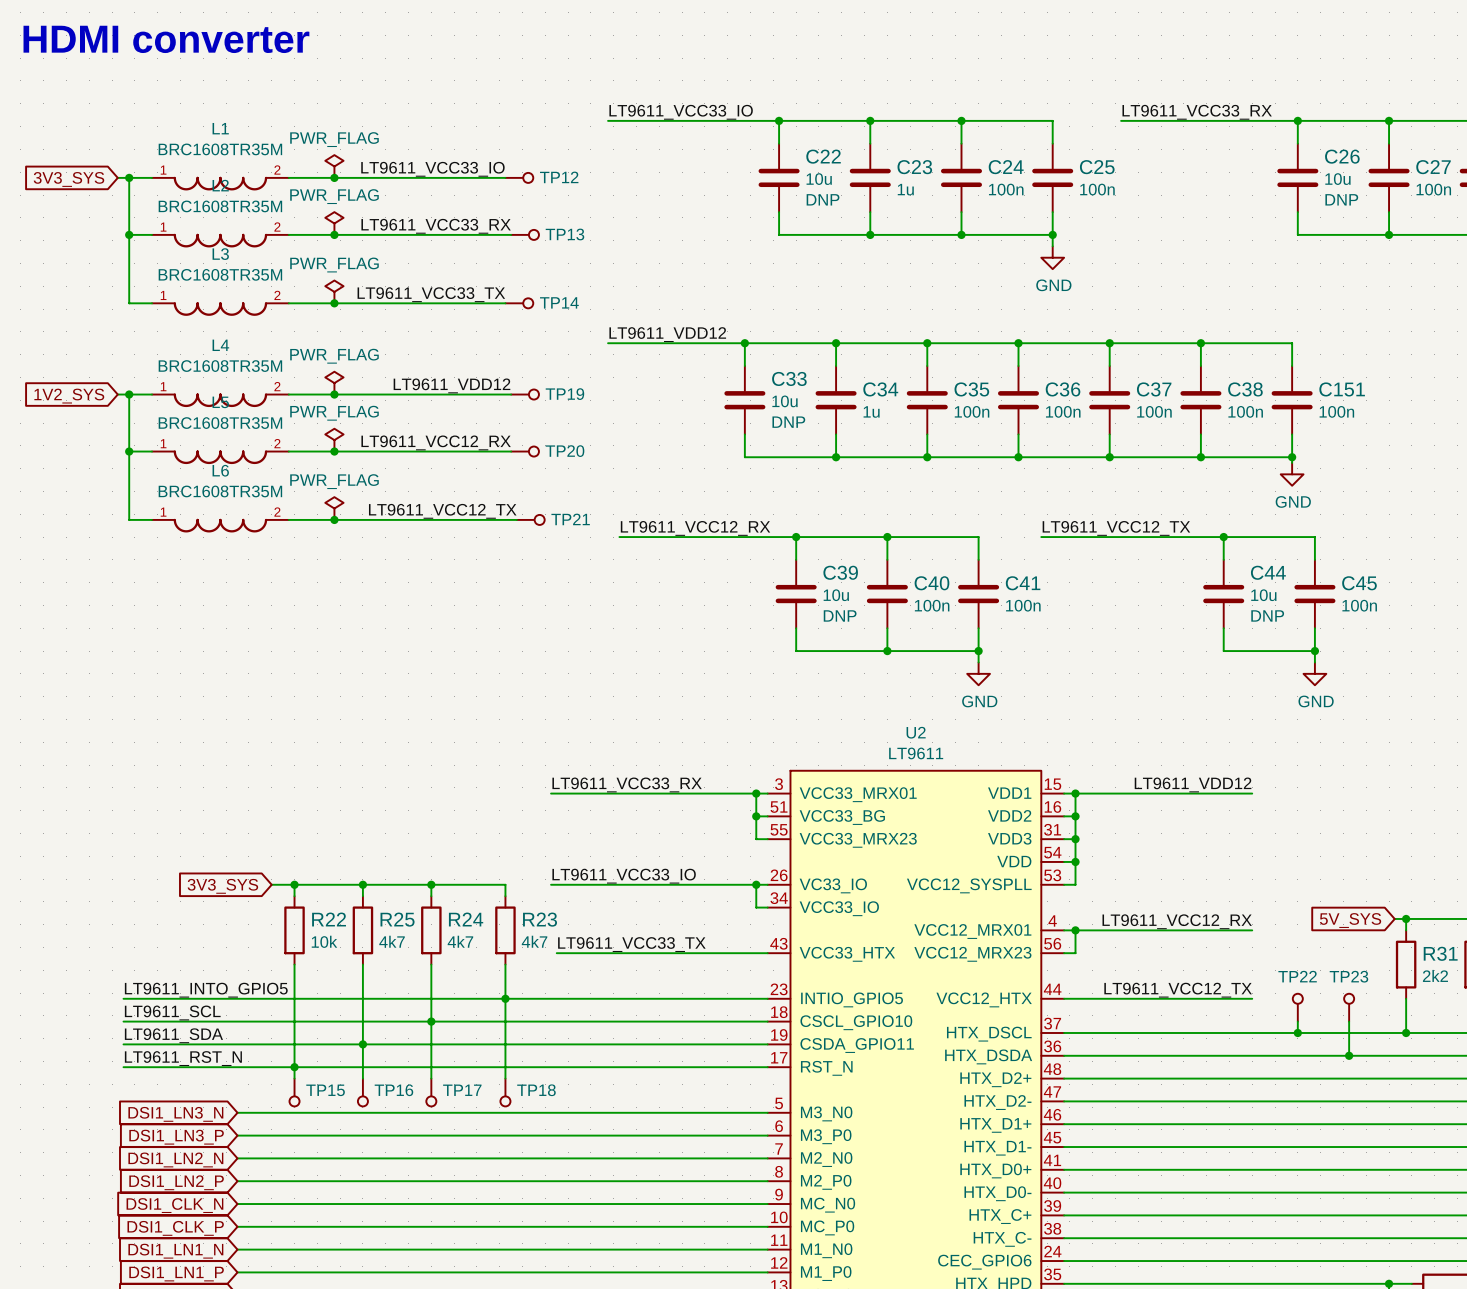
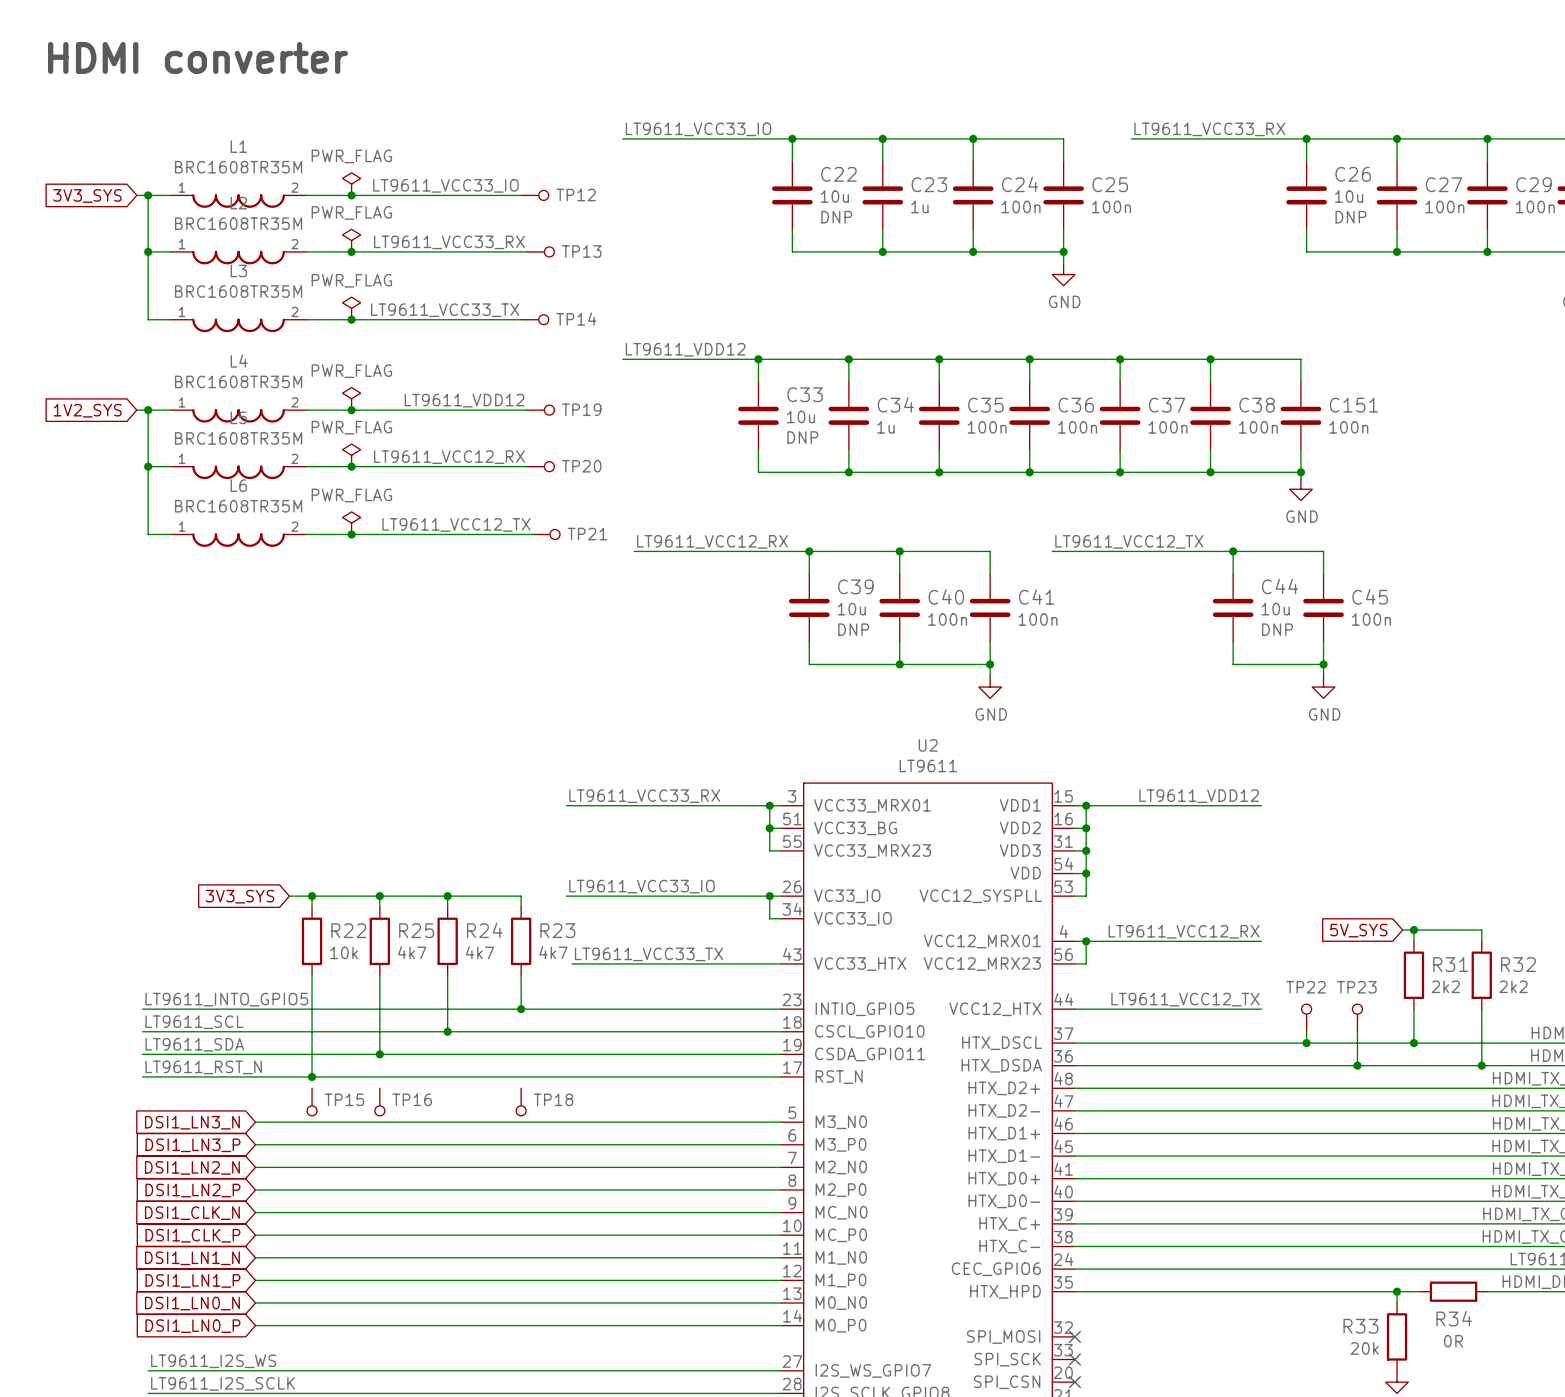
wire: (505, 998) (505, 1078) -> none
wire: (431, 1021) (431, 1078) -> none
wire: (362, 1044) (362, 1078) -> none
wire: (294, 1067) (294, 1078) -> none
TP17: (431, 1092) -> none

